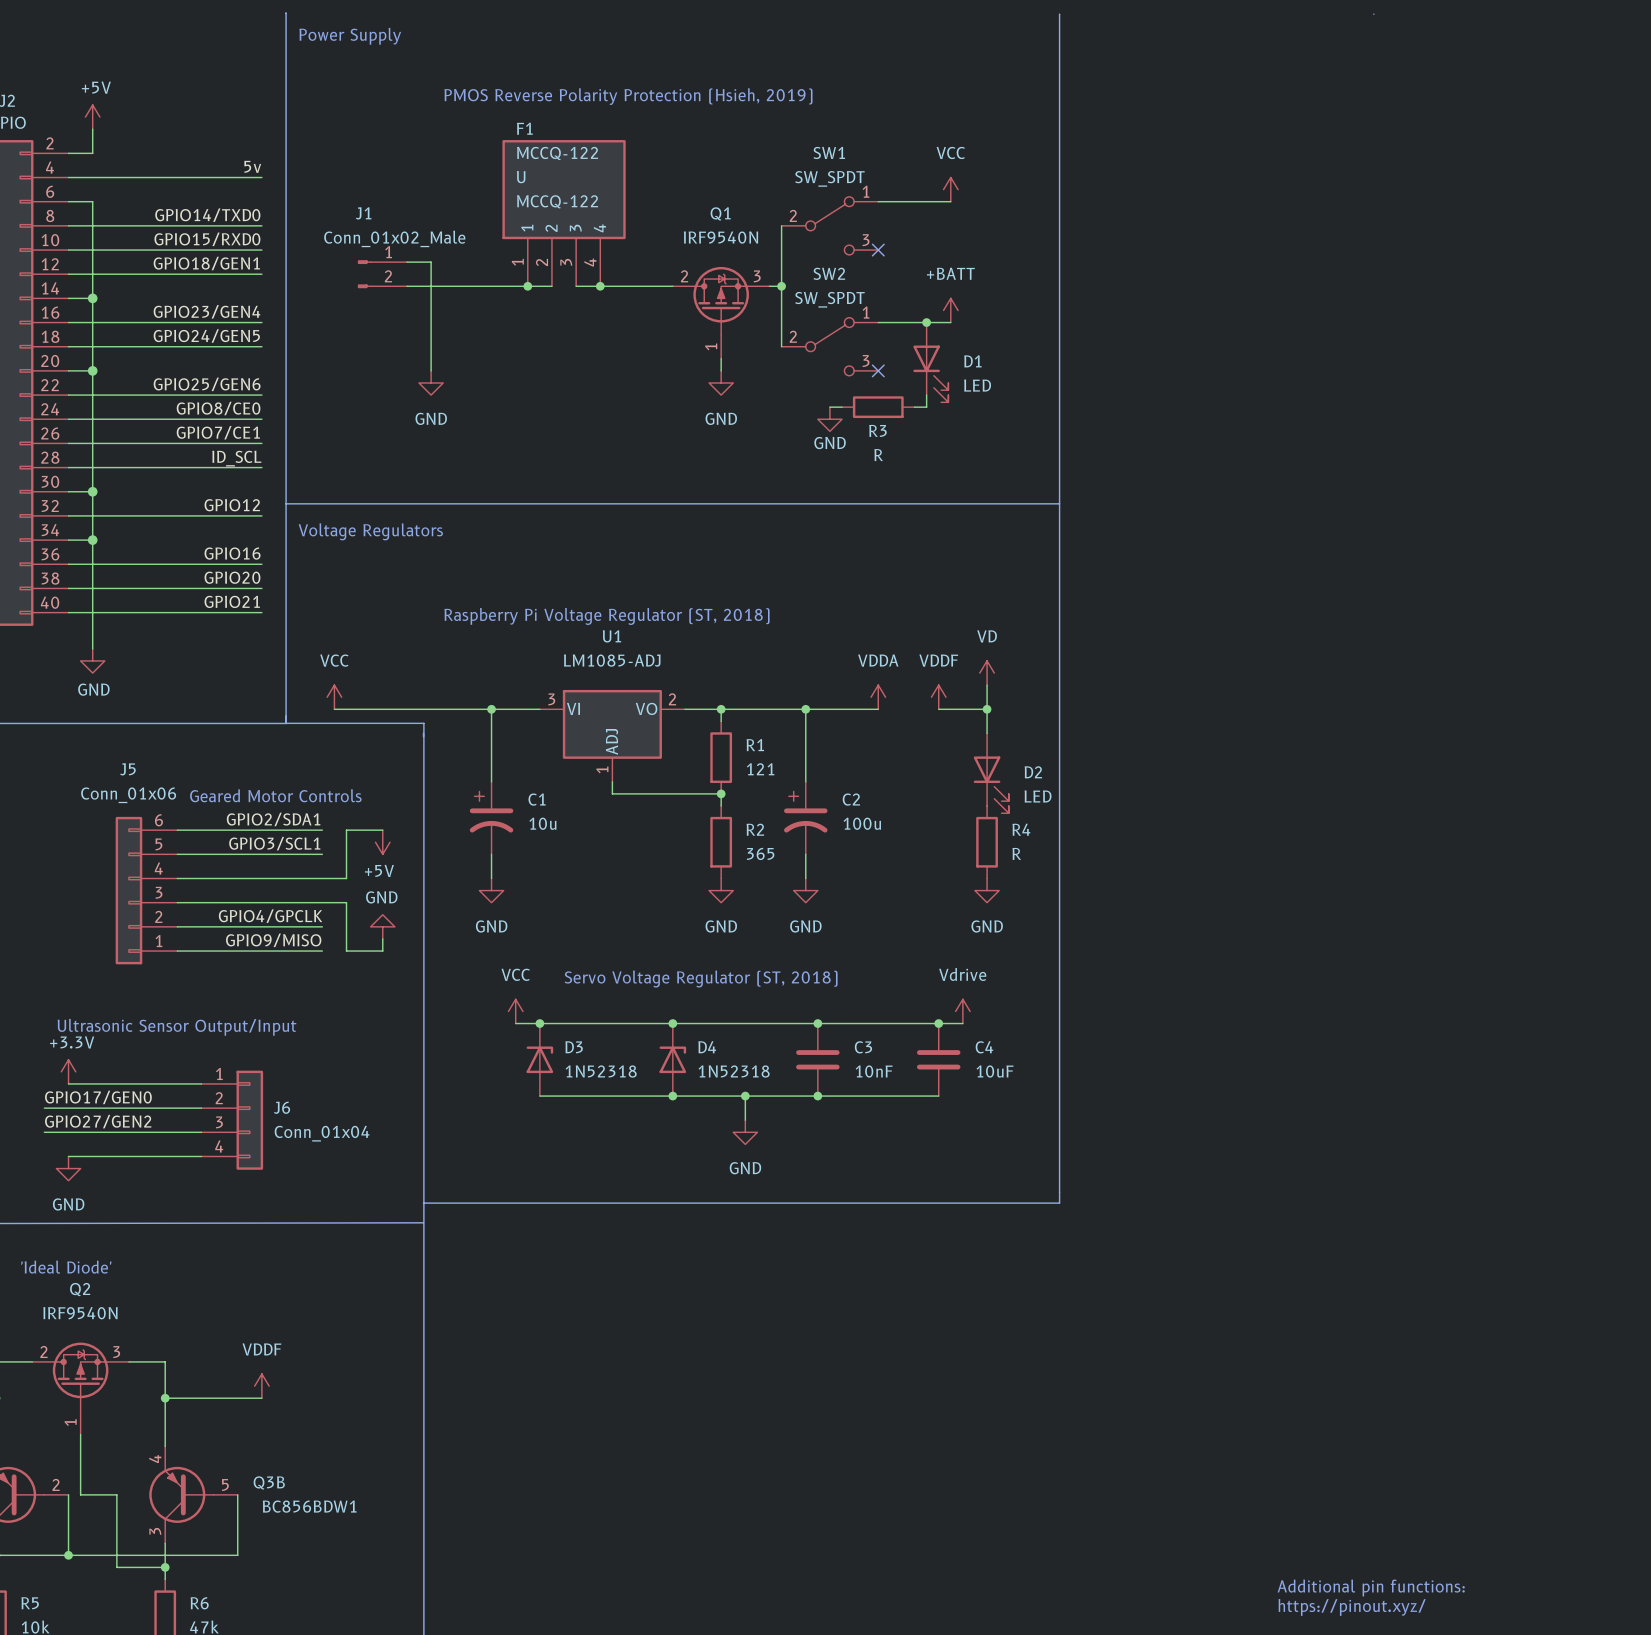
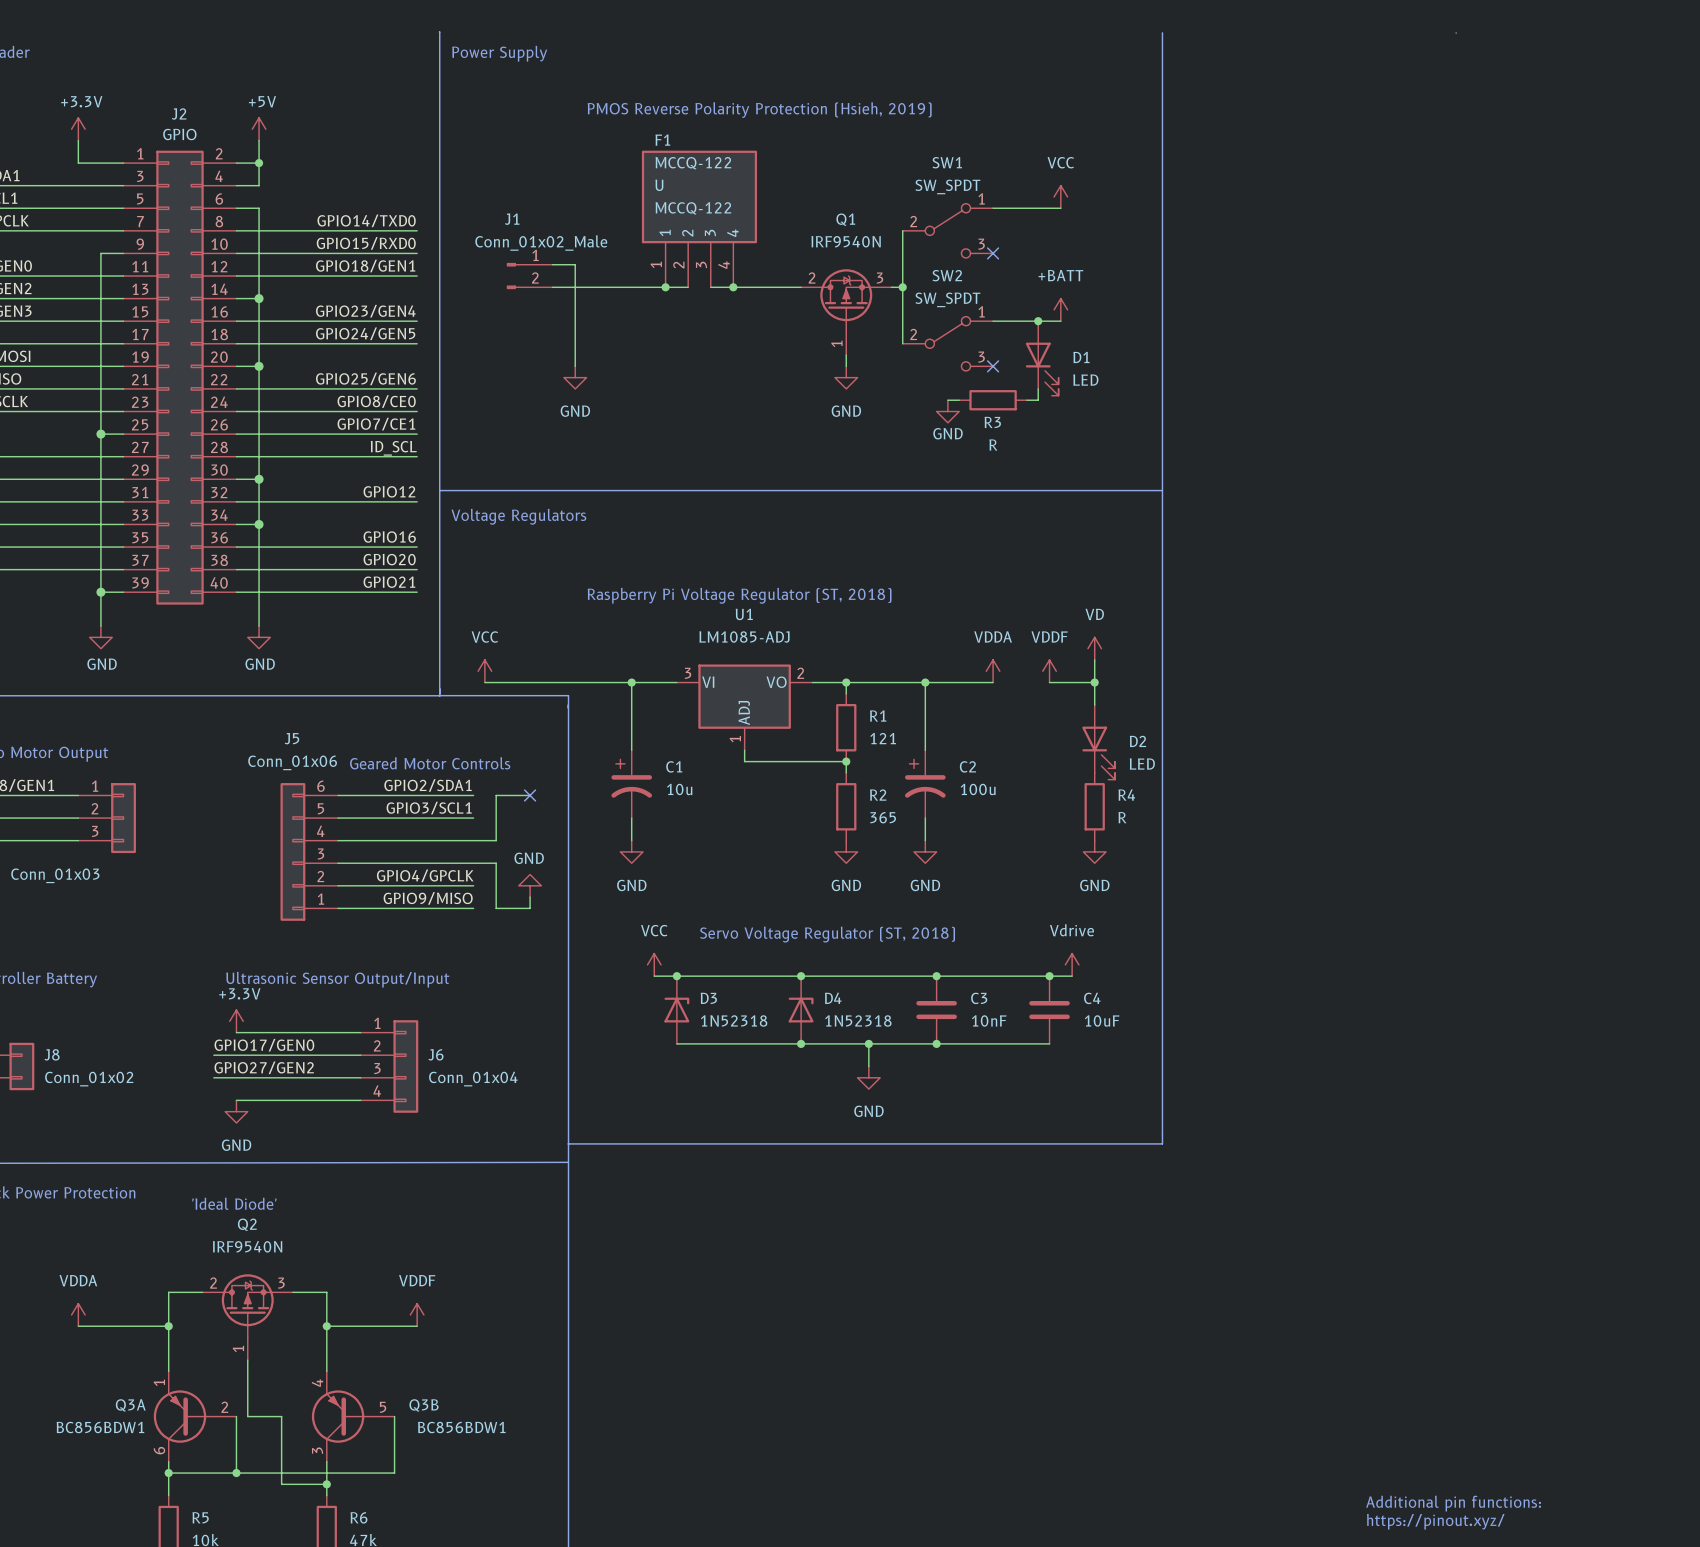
junction: none -> (259, 163)
label: 5v (252, 166) -> none
wire: (92, 177) (261, 177) -> (259, 185) (259, 163)
no-connect mark: none -> (530, 795)
power symbol: +5V (382, 842) -> none

